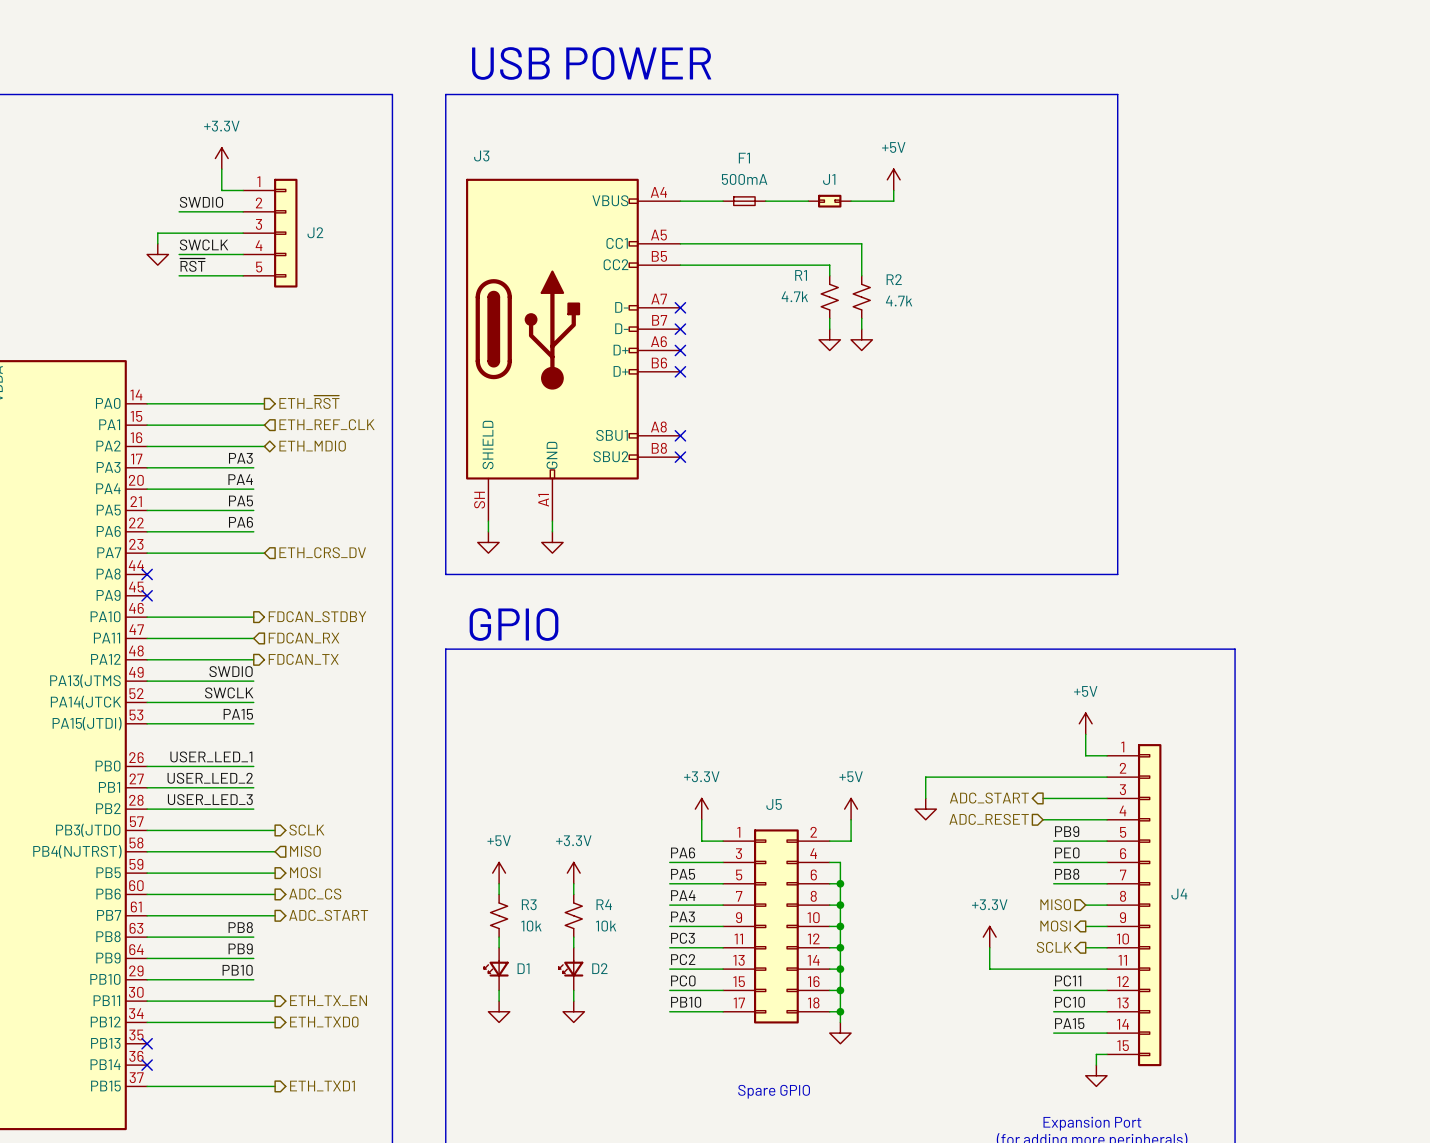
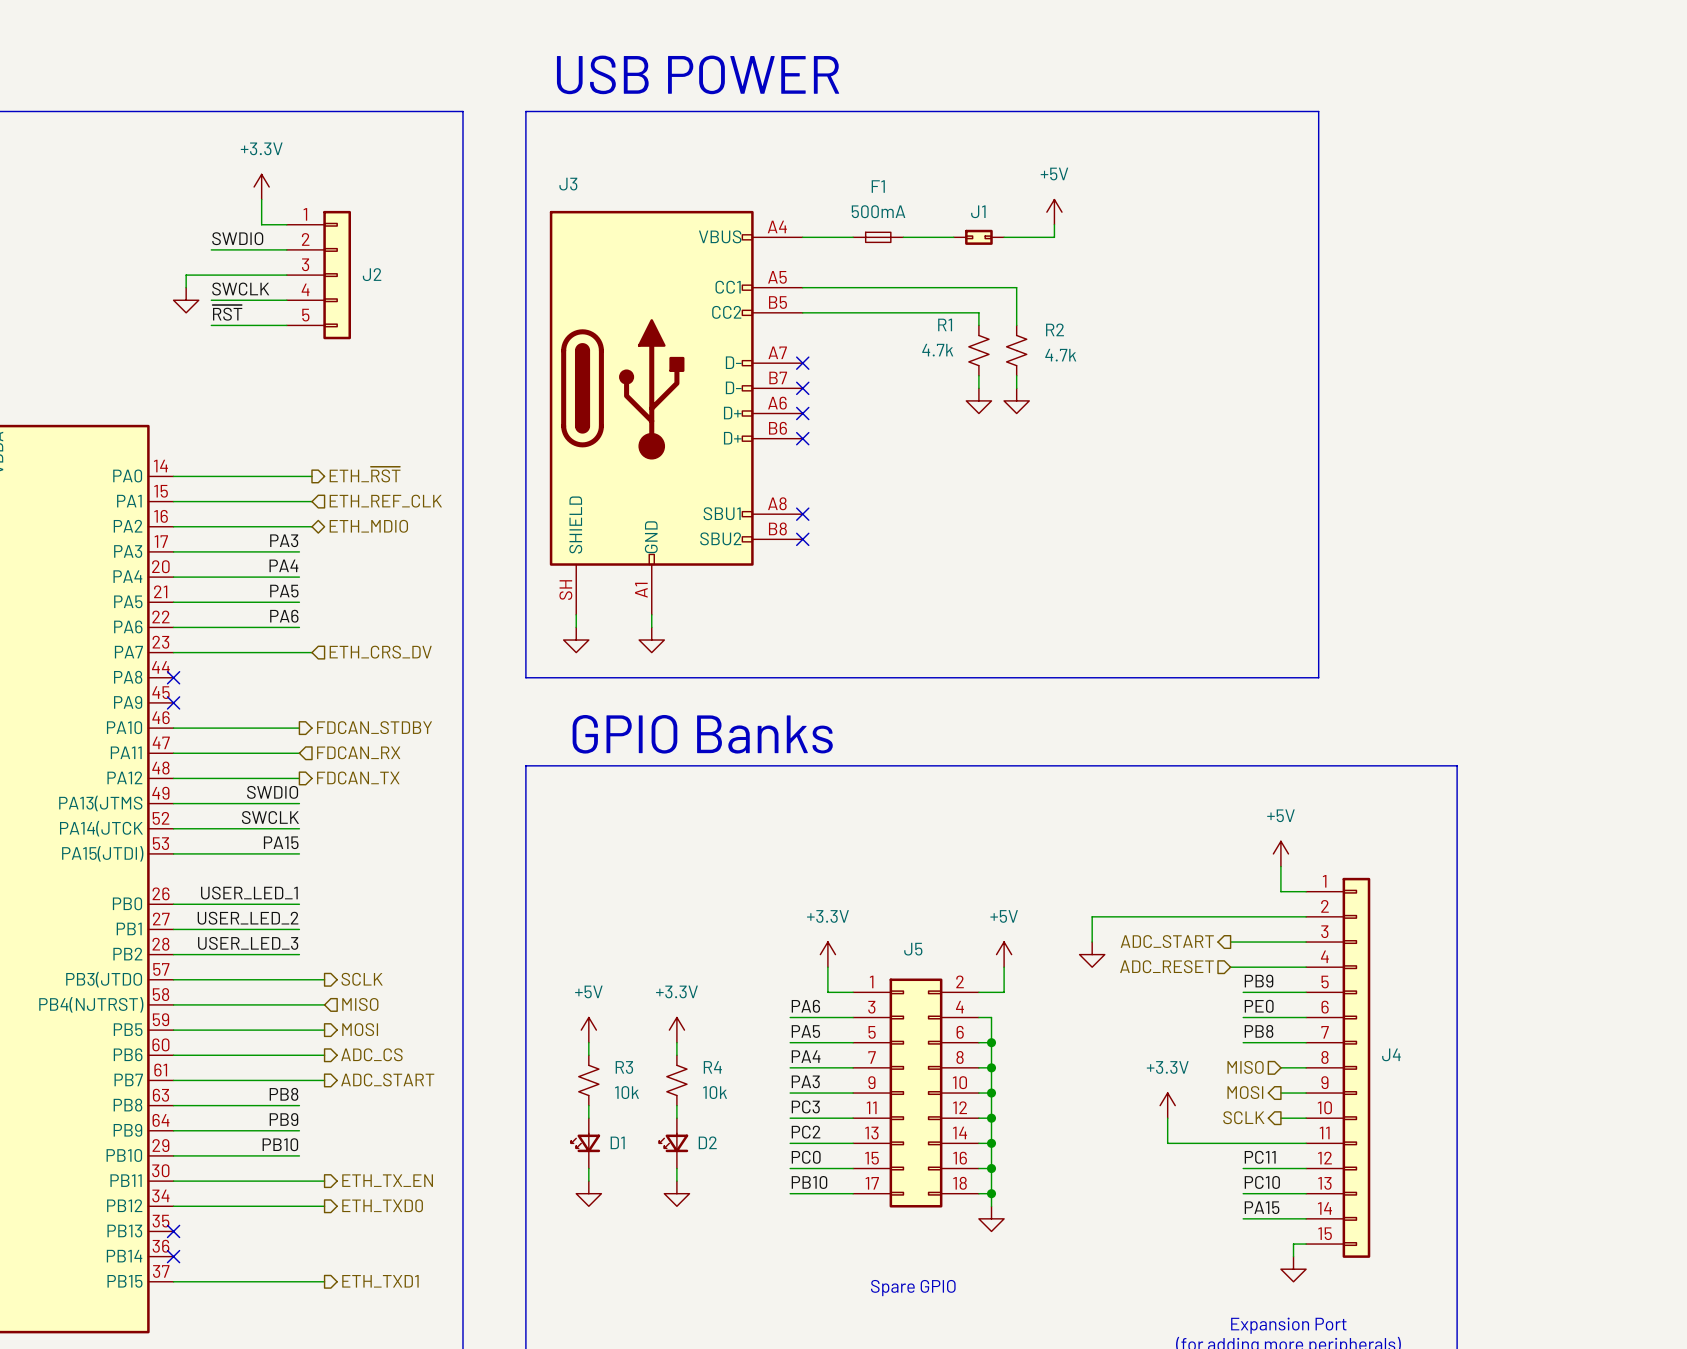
text: none -> GPIO Banks (702, 734)
text: GPIO (514, 624) -> none

